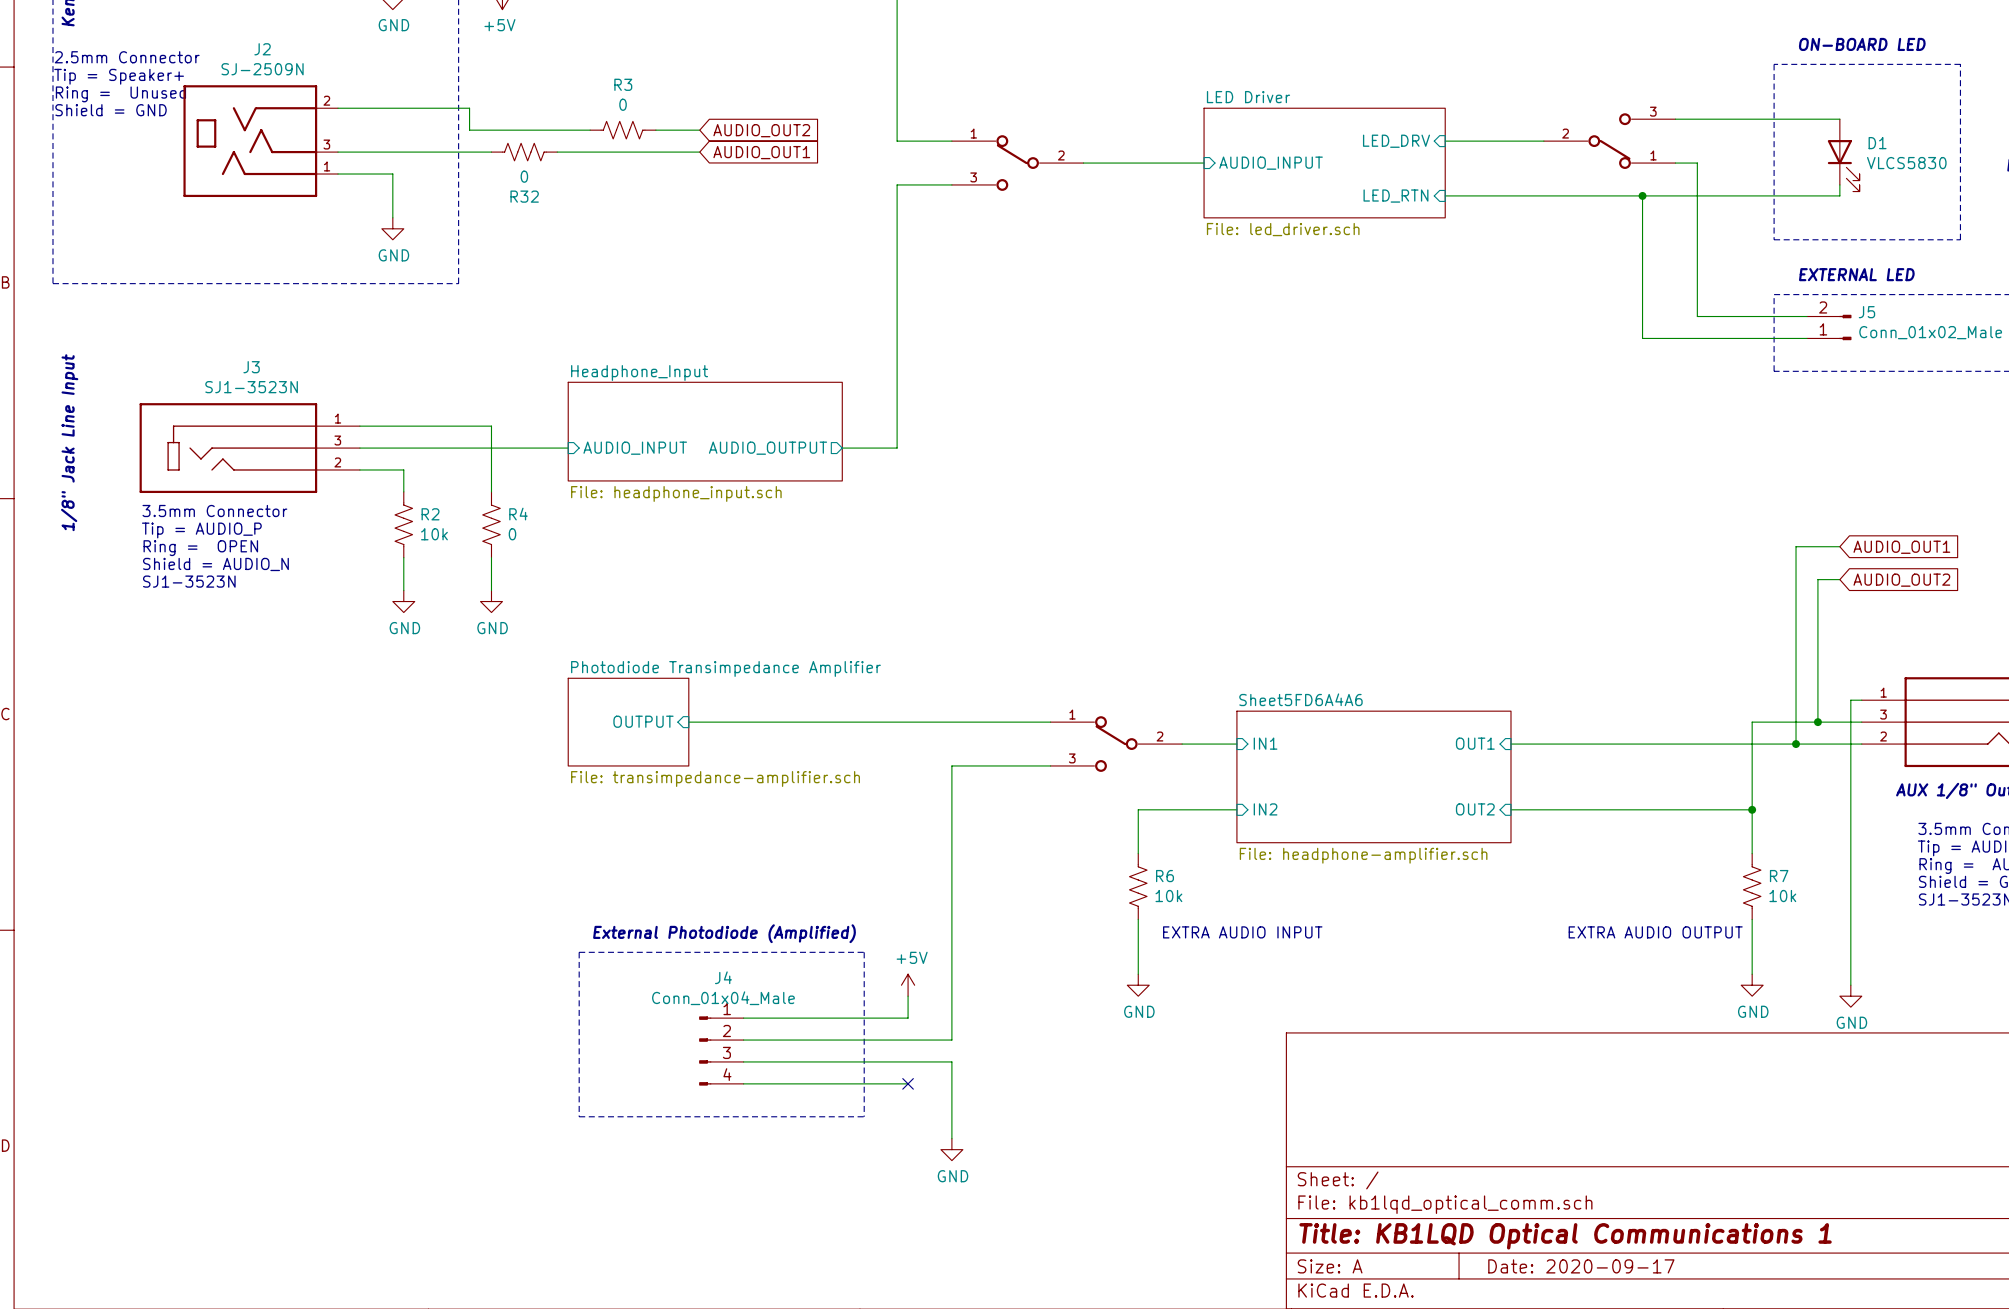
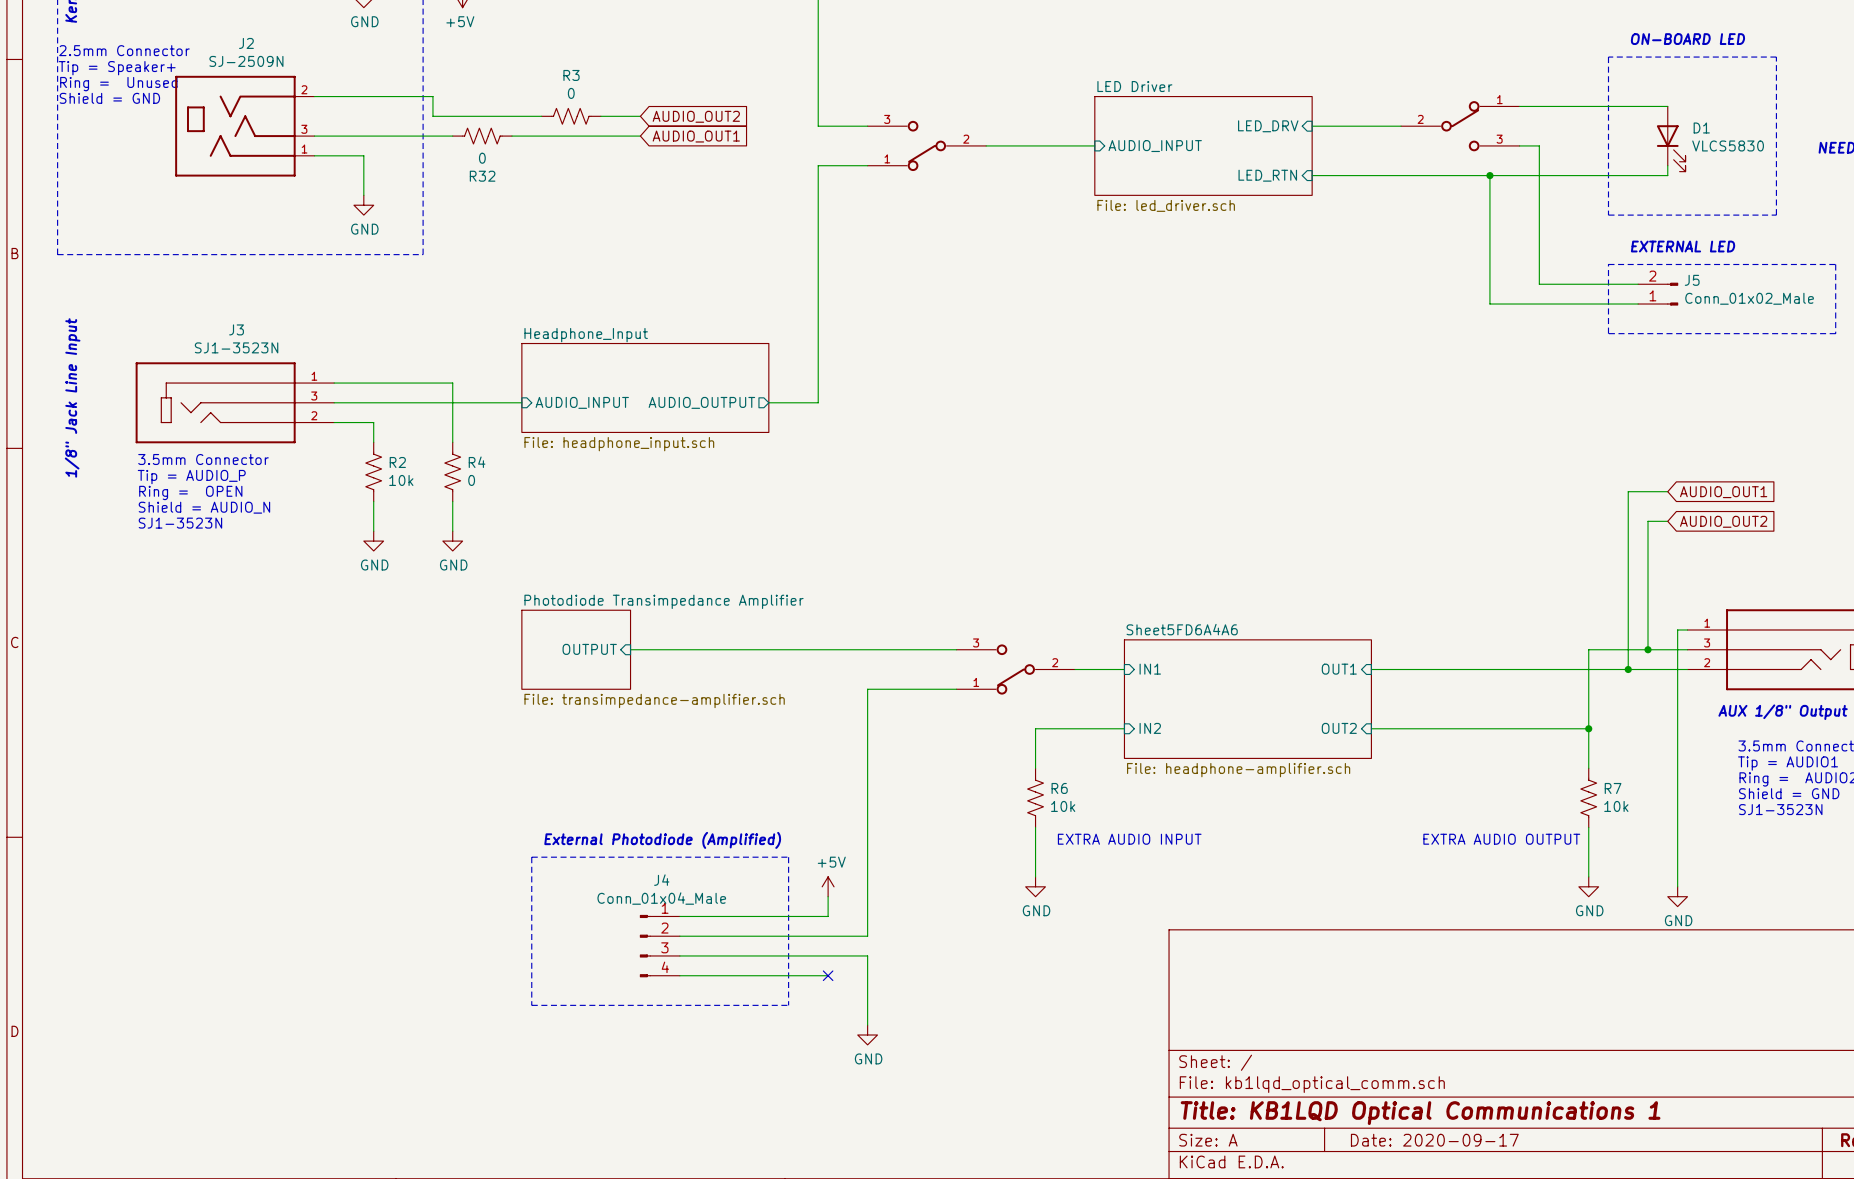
part flip: as is (1609, 141) -> up-down (1460, 126)
part flip: as is (1017, 163) -> up-down (926, 145)
part flip: as is (1116, 744) -> up-down (1015, 669)

